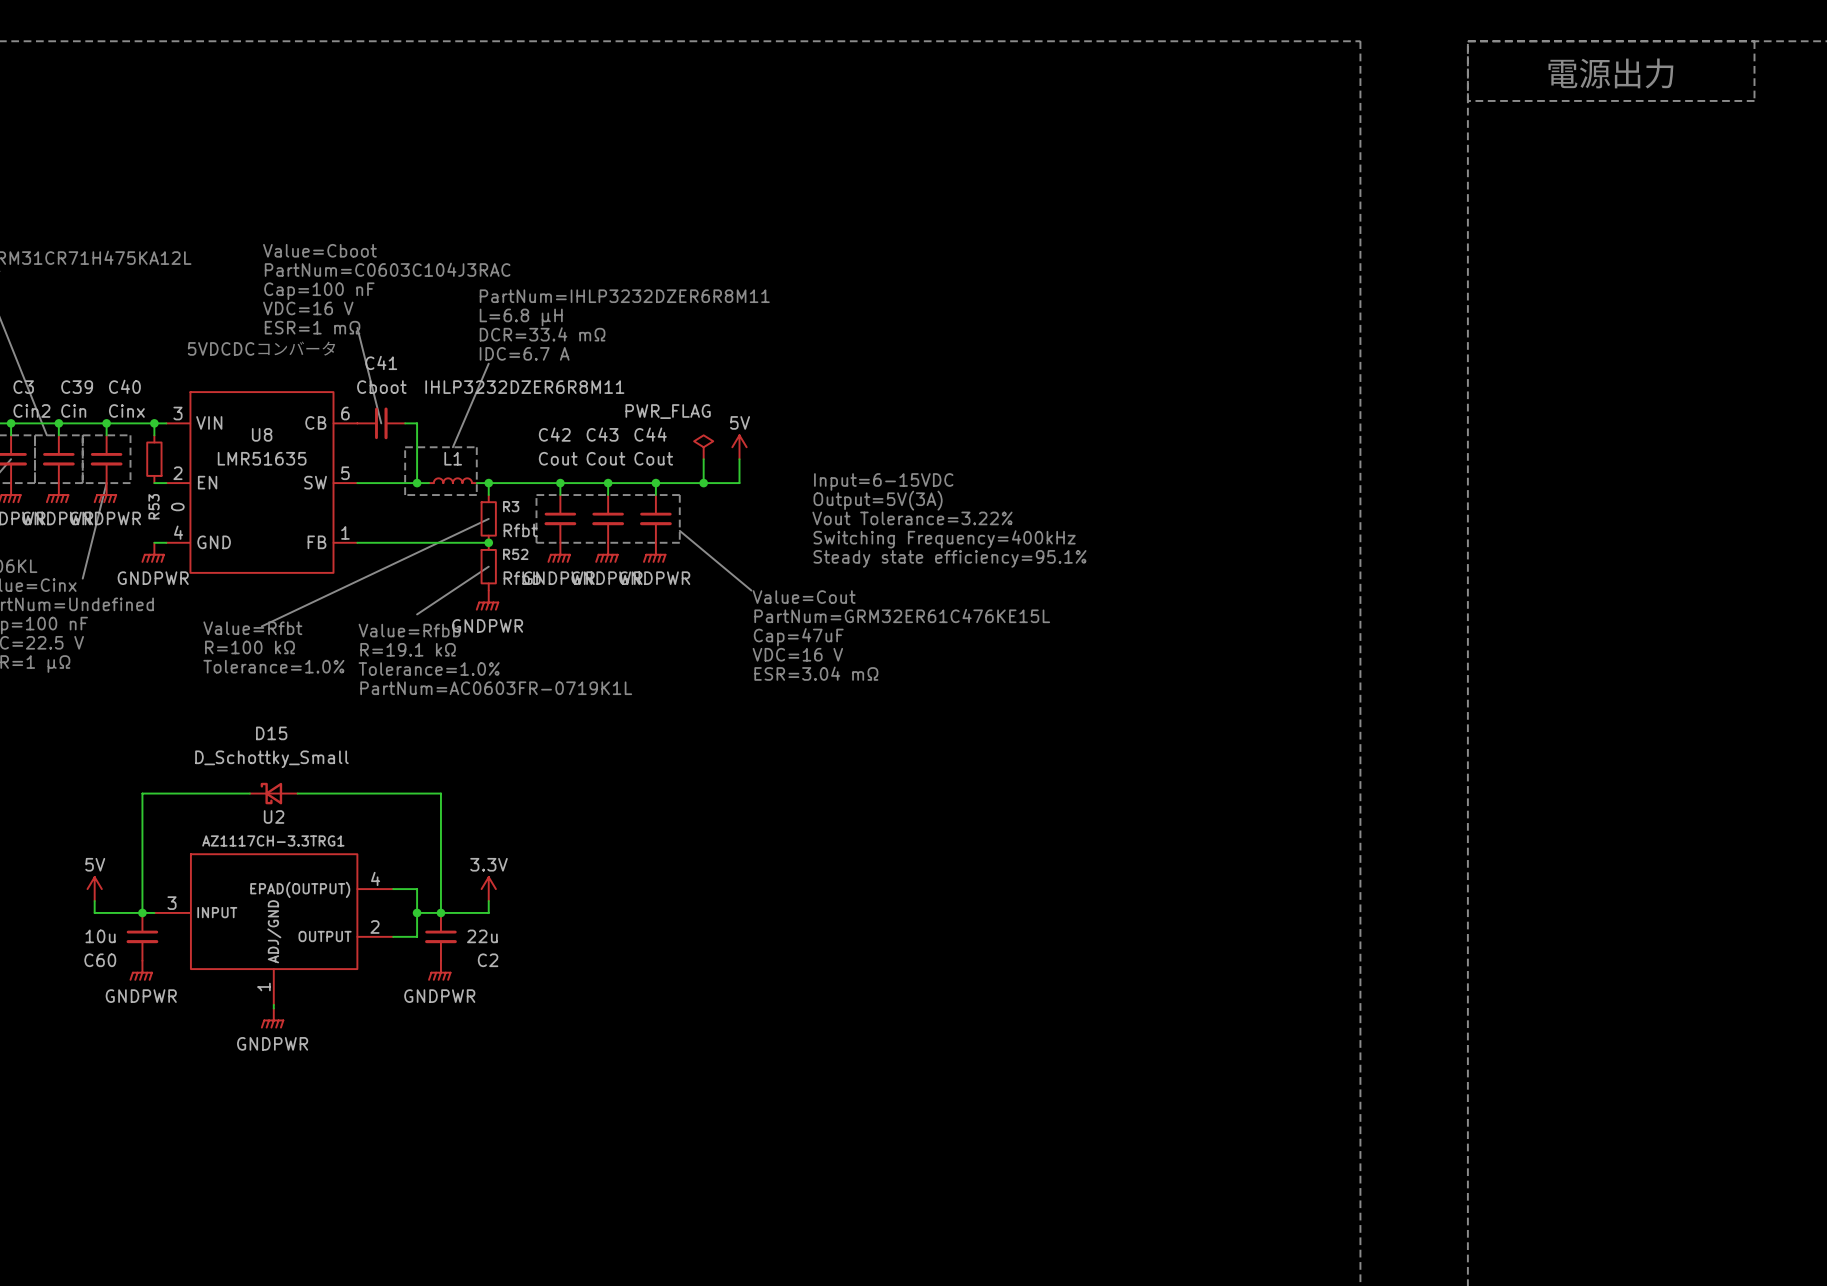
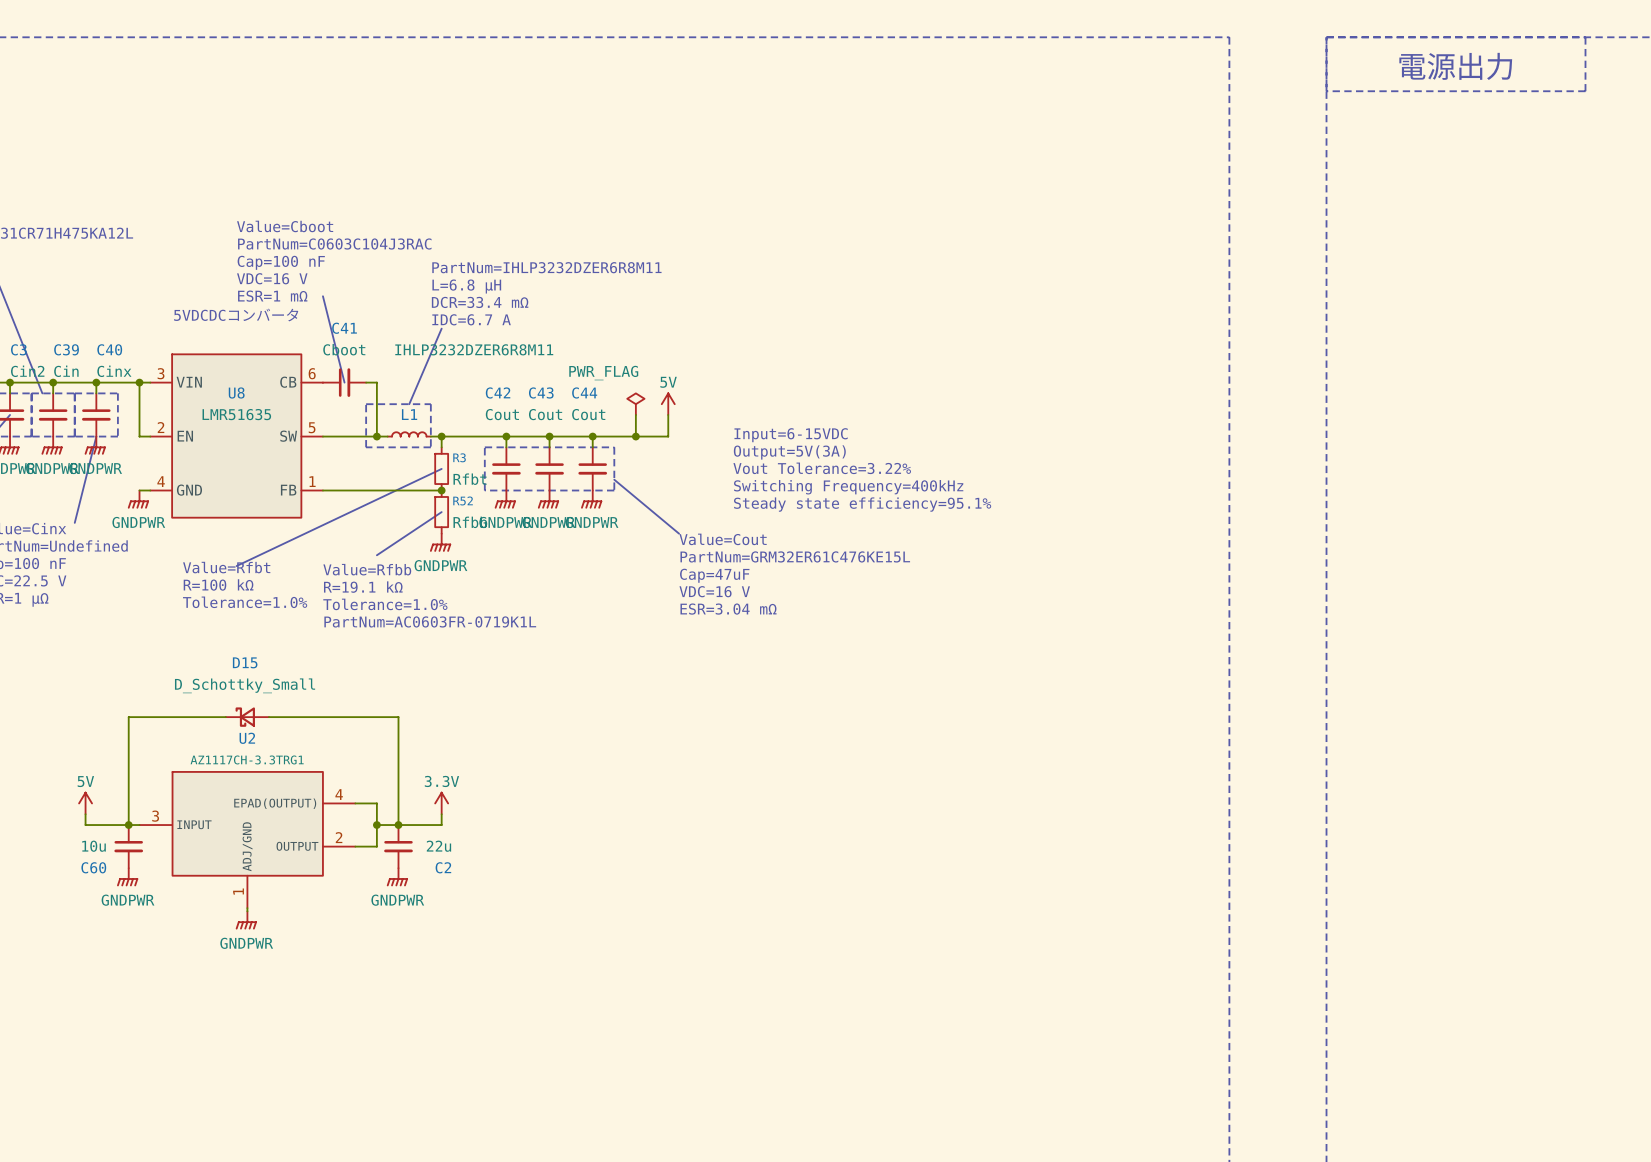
wire: none -> (139, 393) (139, 436)
R53: 0 (154, 459) -> none

